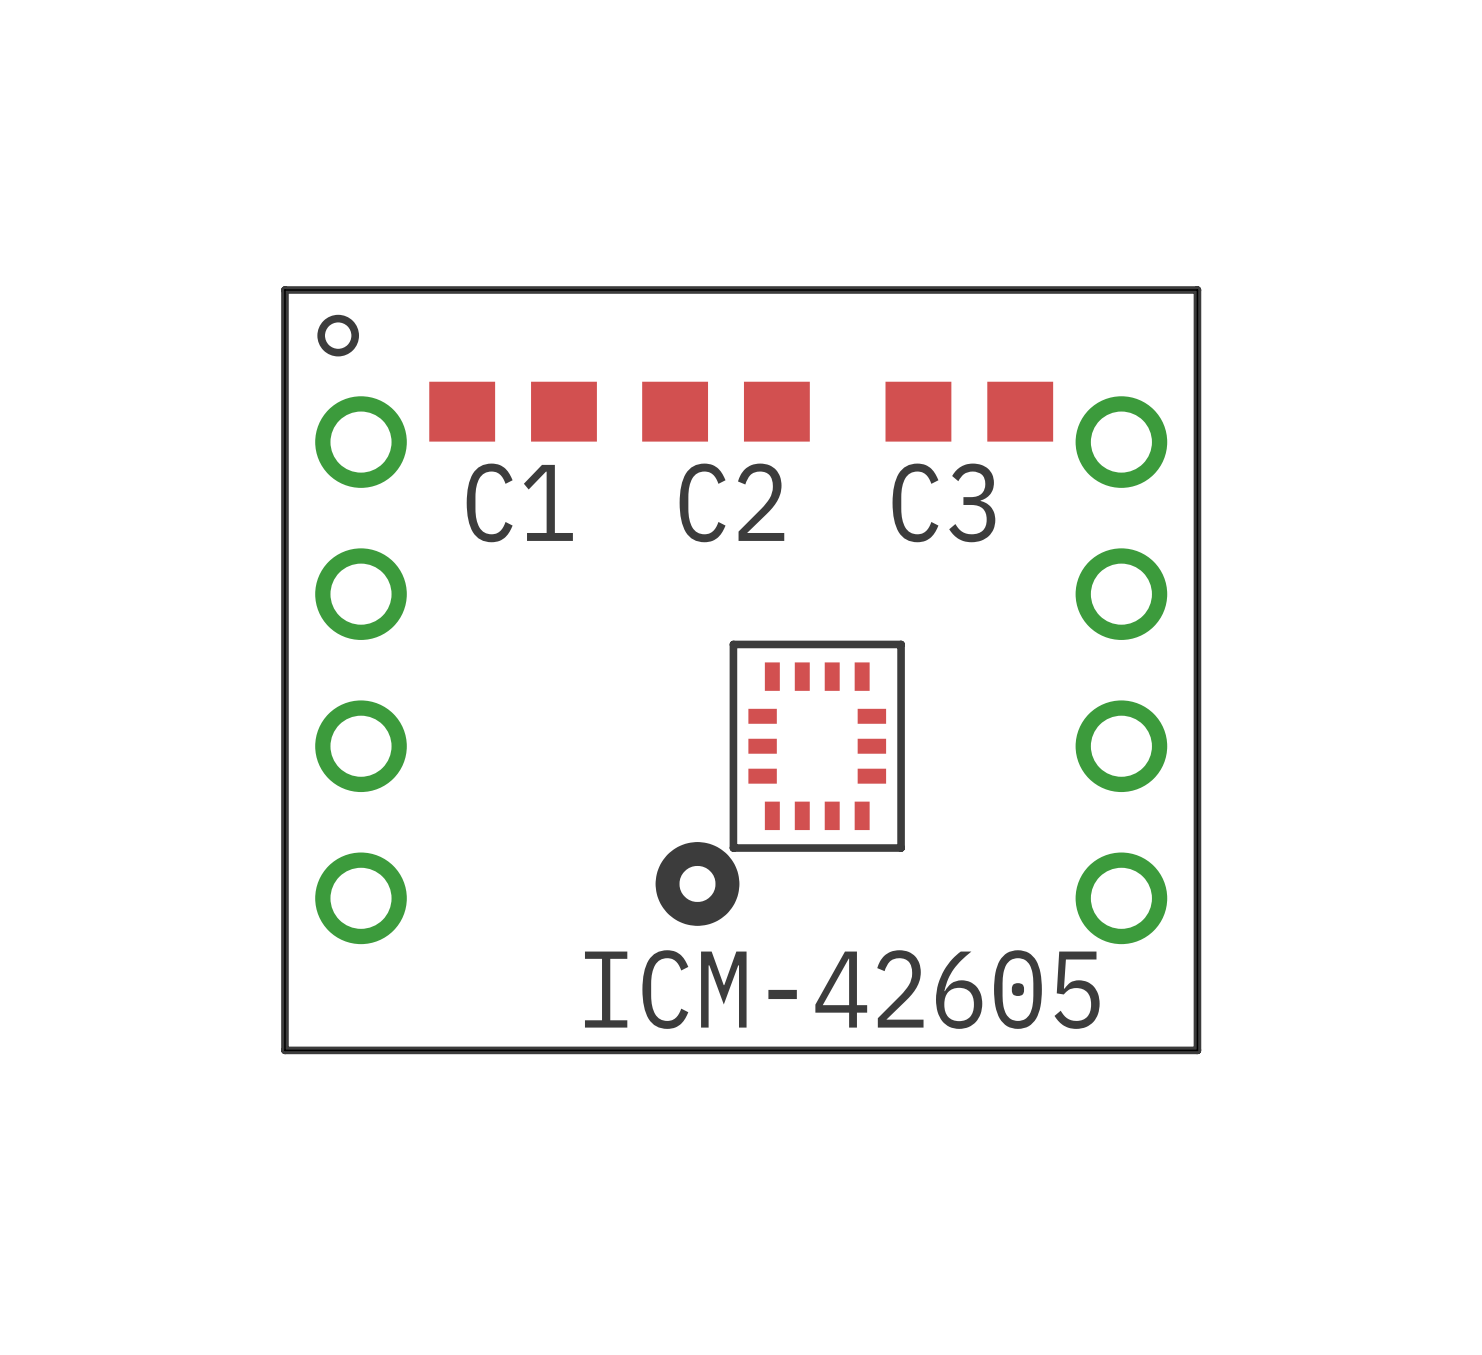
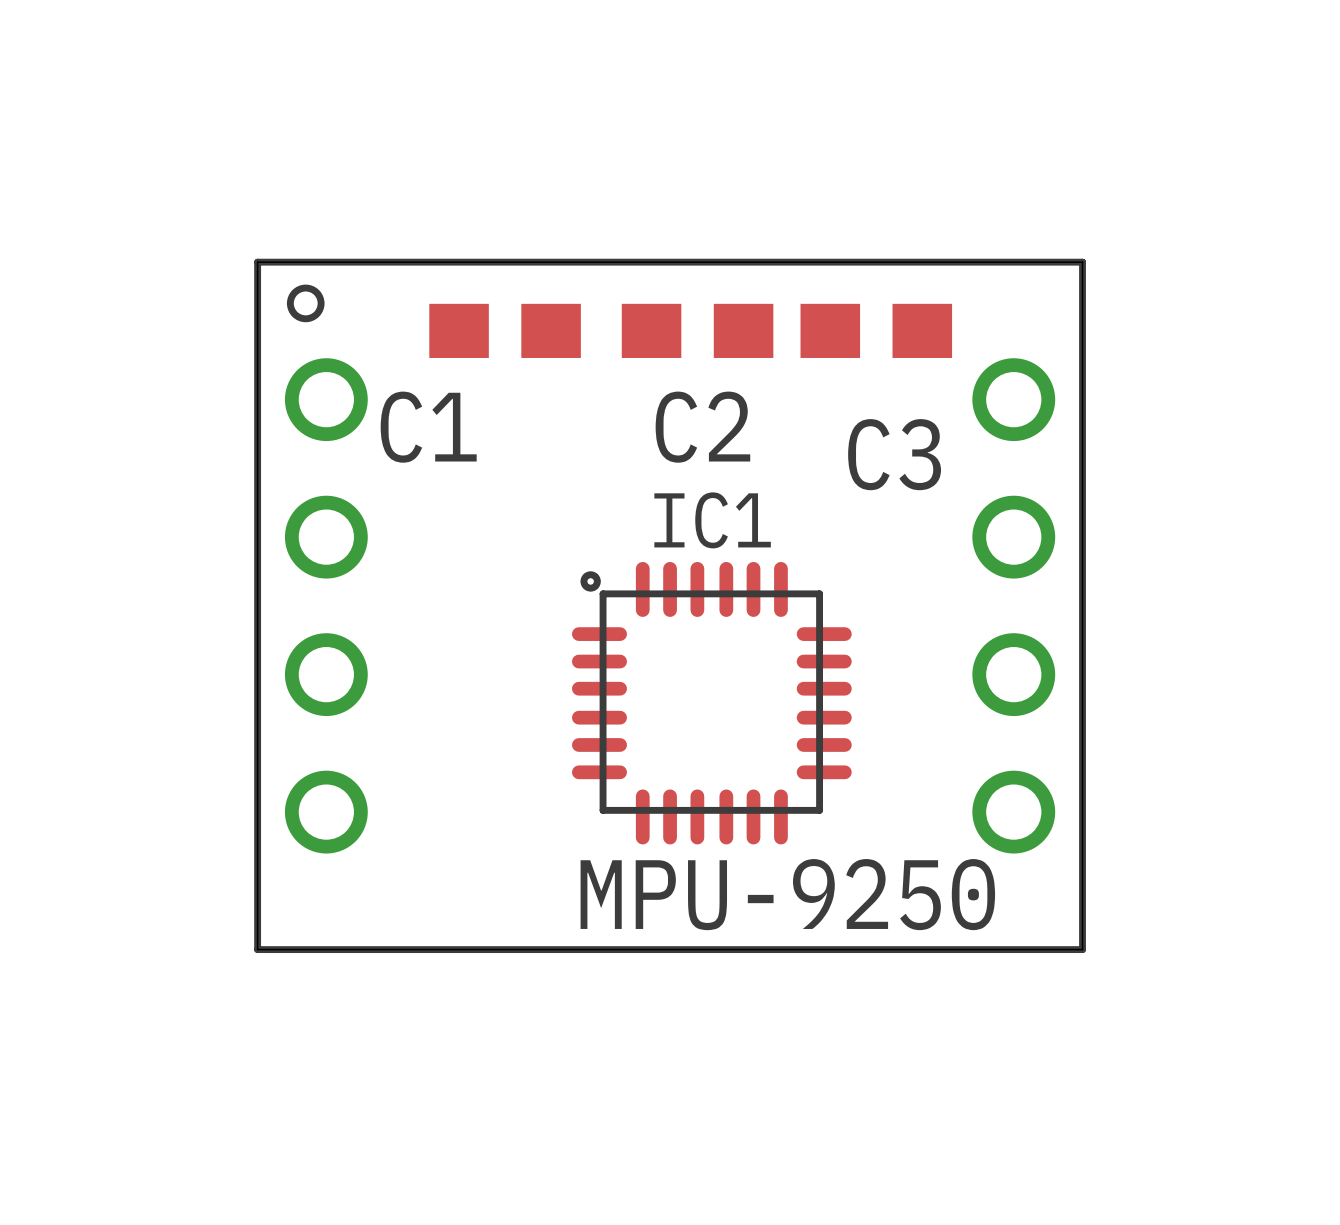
C1 position: (513, 411) -> (505, 330)
C2 position: (726, 411) -> (697, 330)
C3 position: (969, 411) -> (876, 330)
C1 name position: C1 (519, 502) -> C1 (428, 427)
C2 name position: C2 (731, 502) -> C2 (702, 427)
C3 name position: C3 (943, 502) -> C3 (894, 454)
IC1: none -> (711, 703)
part: (780, 783) -> none
text: ICM-42605 (842, 989) -> MPU-9250 (787, 894)

